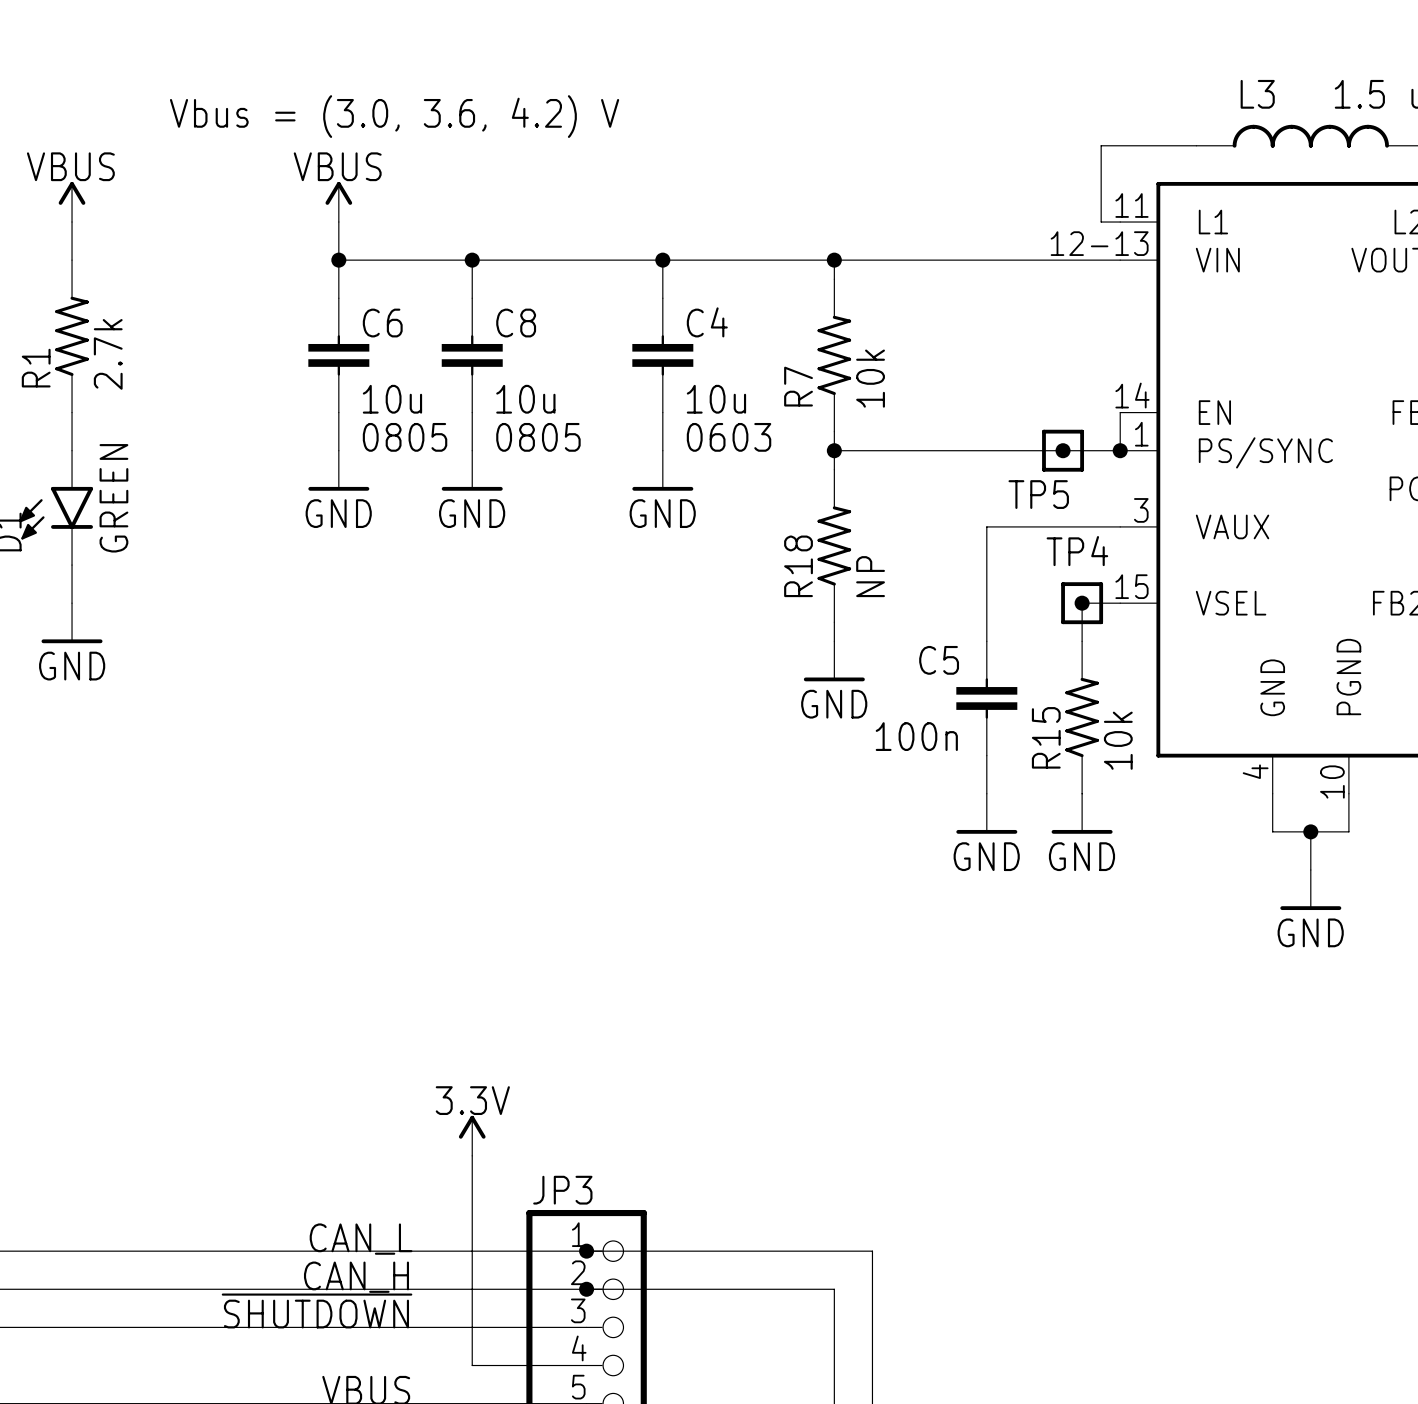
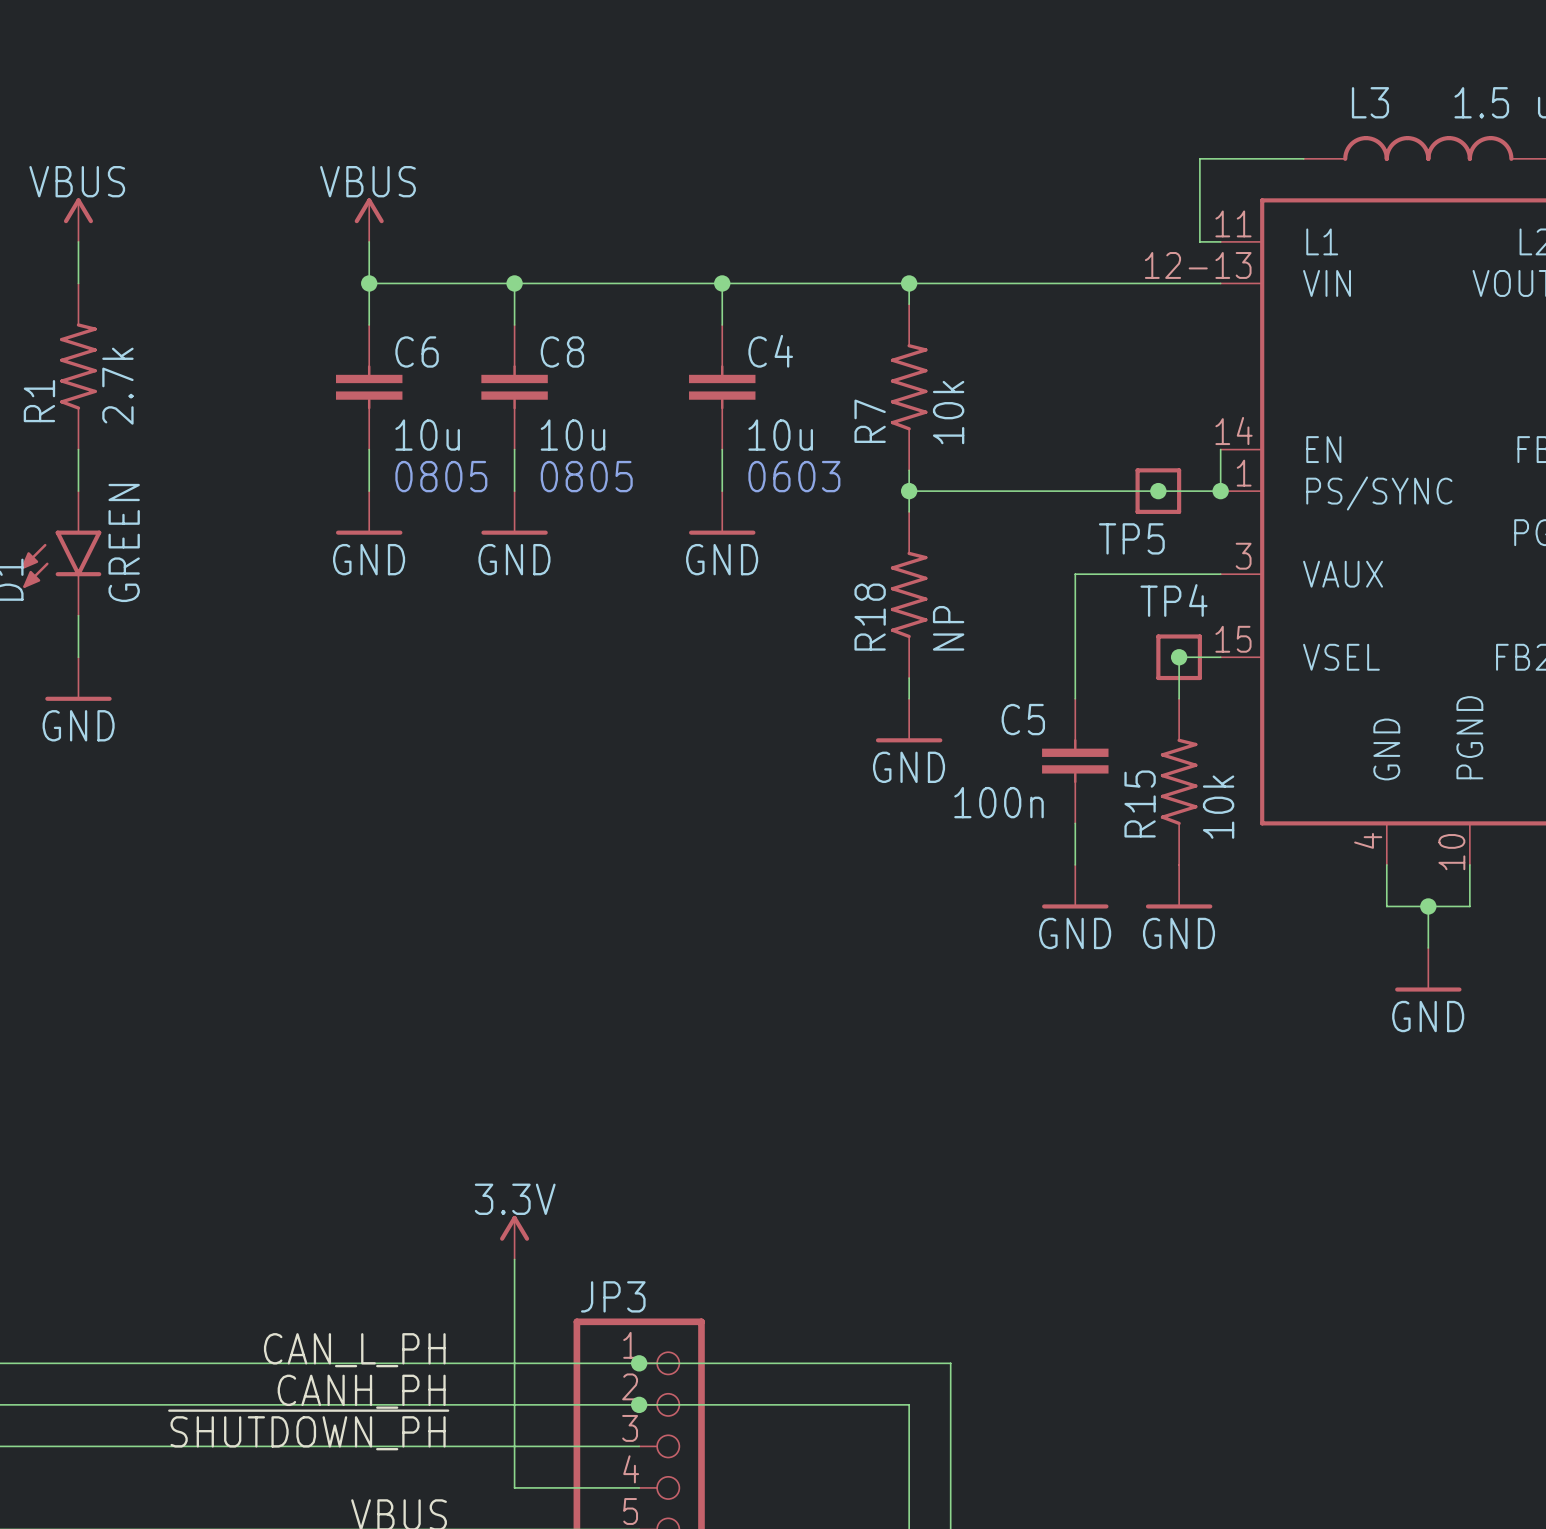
text: Vbus = (3.0, 3.6, 4.2) V (394, 116) -> none
label: CAN_L (361, 1239) -> CAN_L_PH (354, 1350)
label: CAN_H (356, 1277) -> CANH_PH (361, 1391)
label: ~{SHUTDOWN} (317, 1310) -> ~{SHUTDOWN_PH} (308, 1429)

